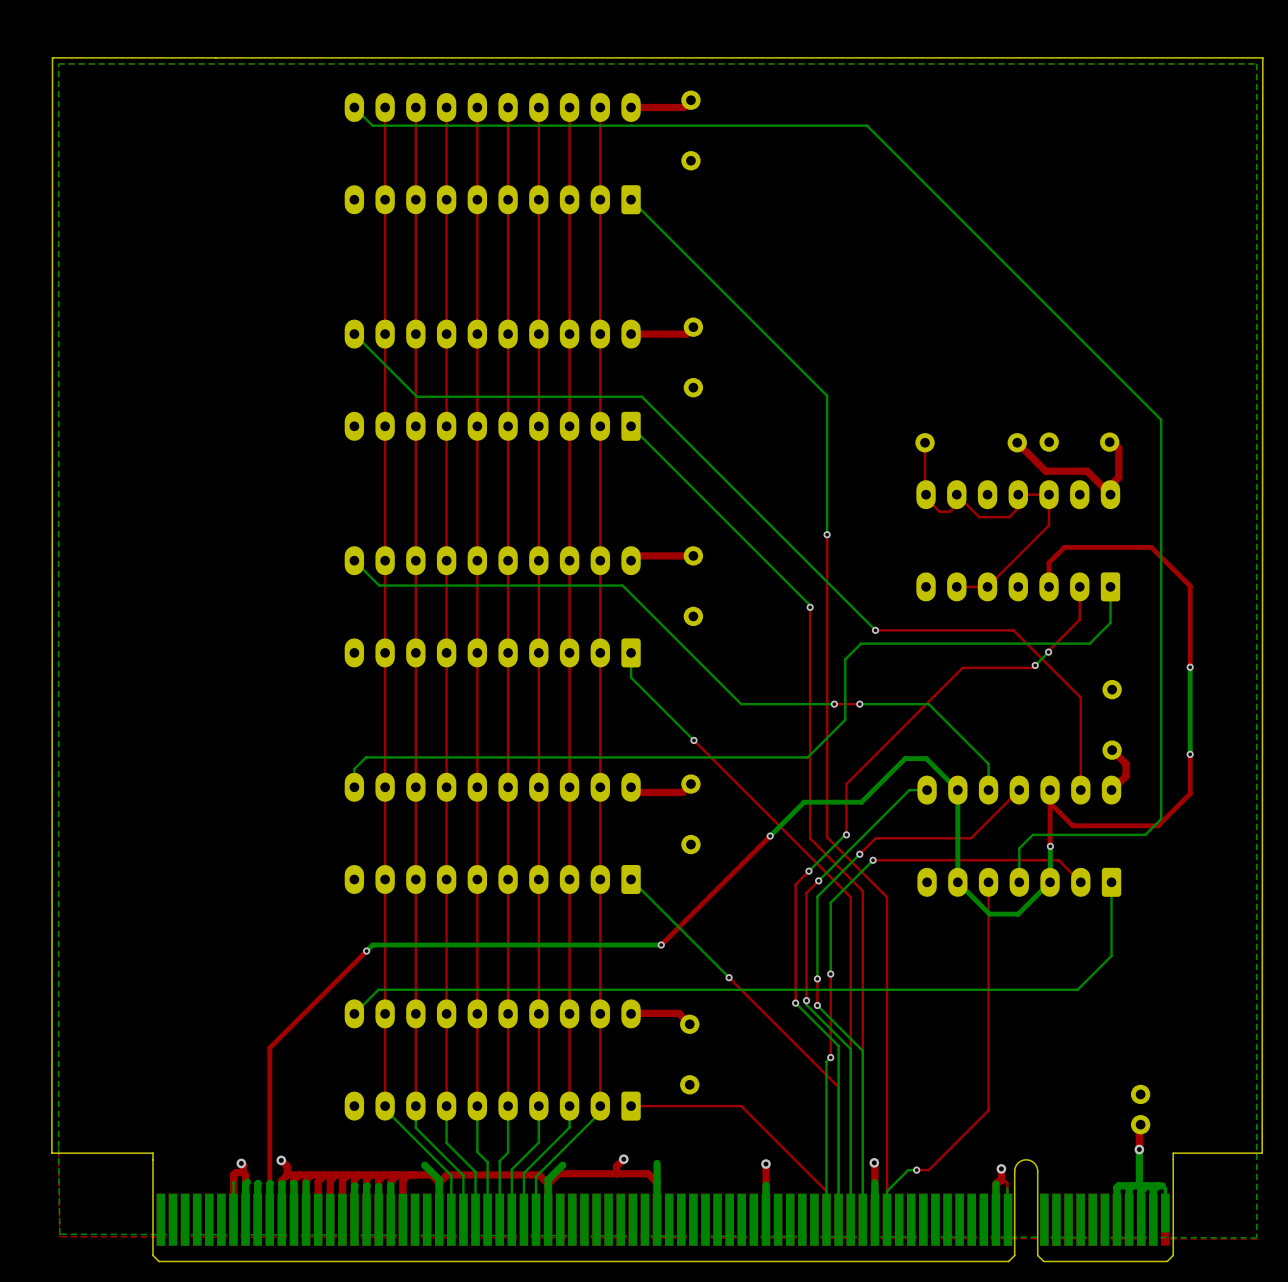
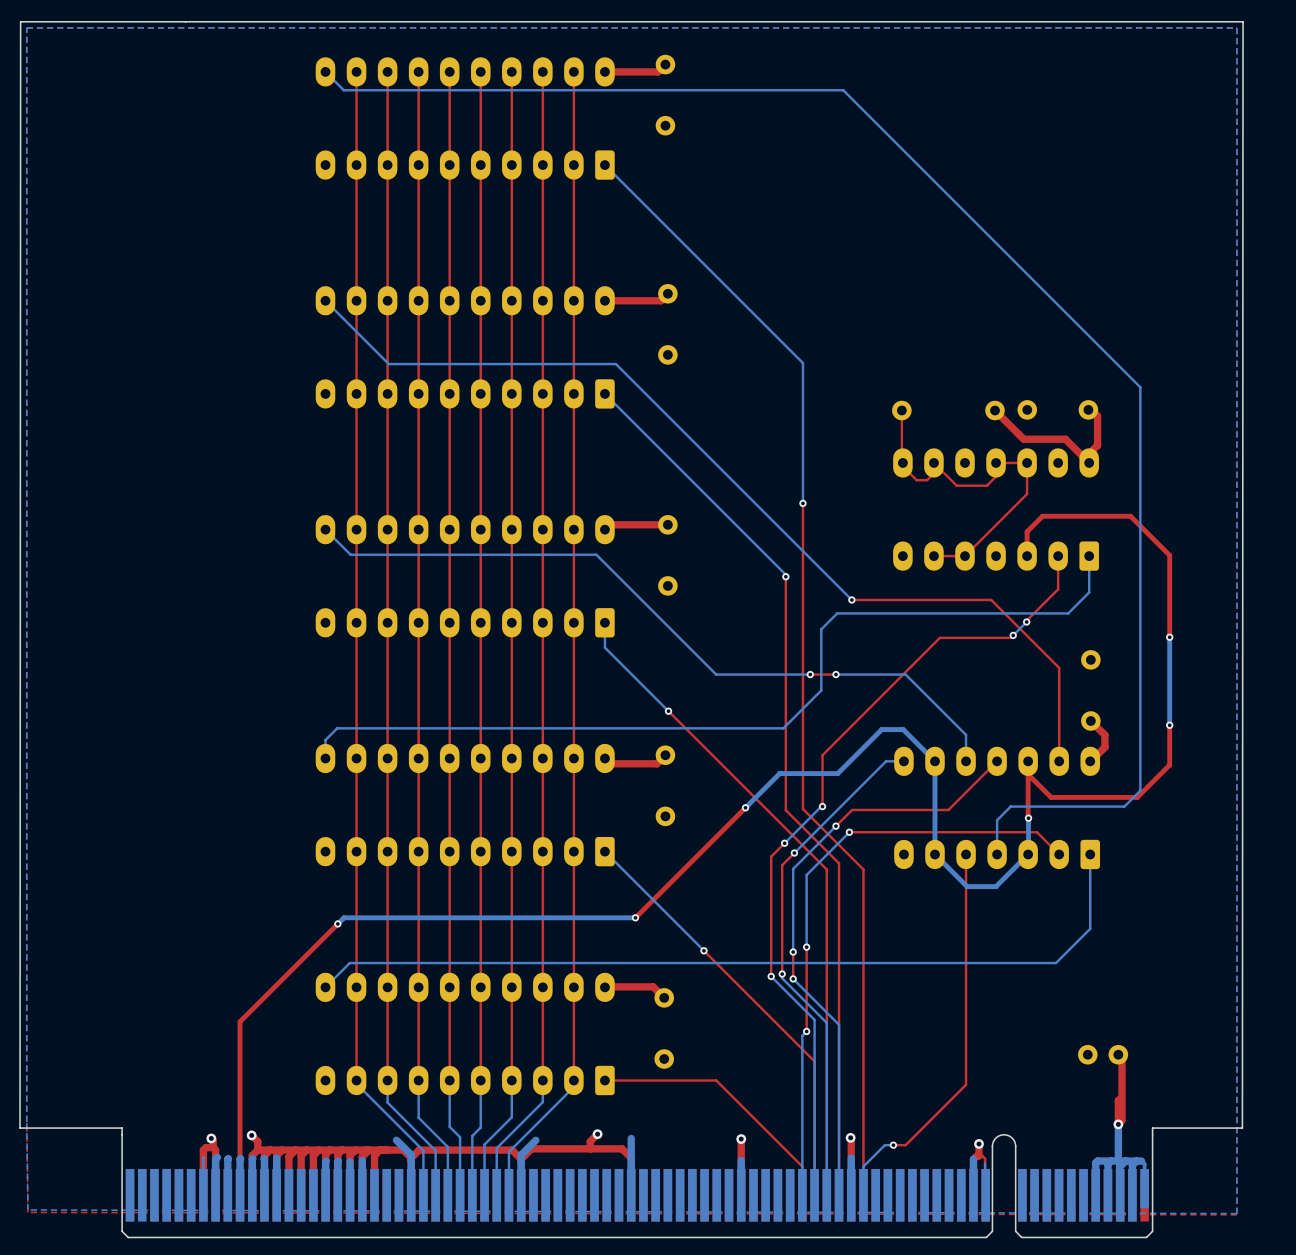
top track: none -> (1118, 1054) (1122, 1058) (1122, 1120)
part rotation: 0° (1140, 1109) -> 90° clockwise (1103, 1054)
part position: (1140, 1109) -> (1103, 1054)

